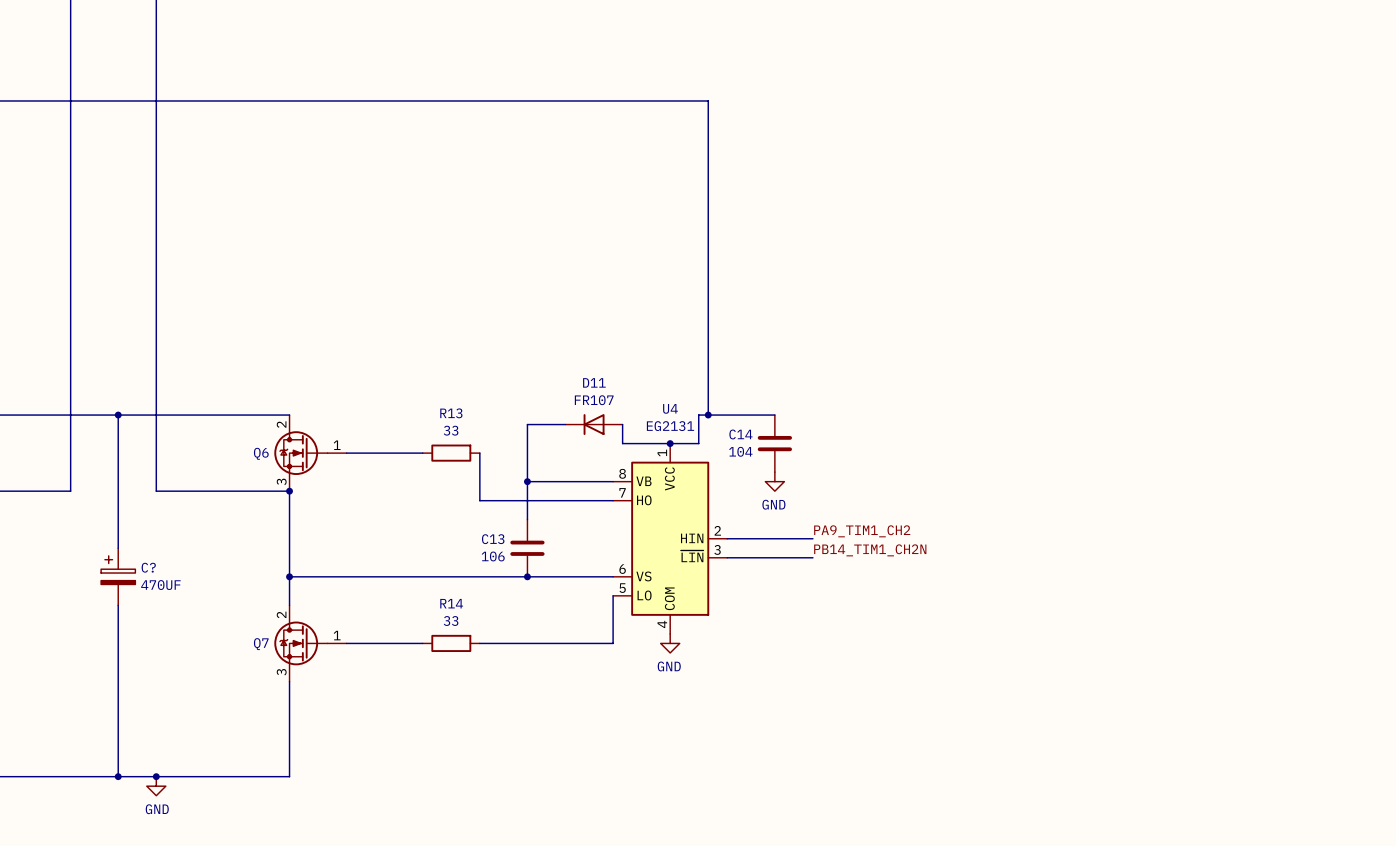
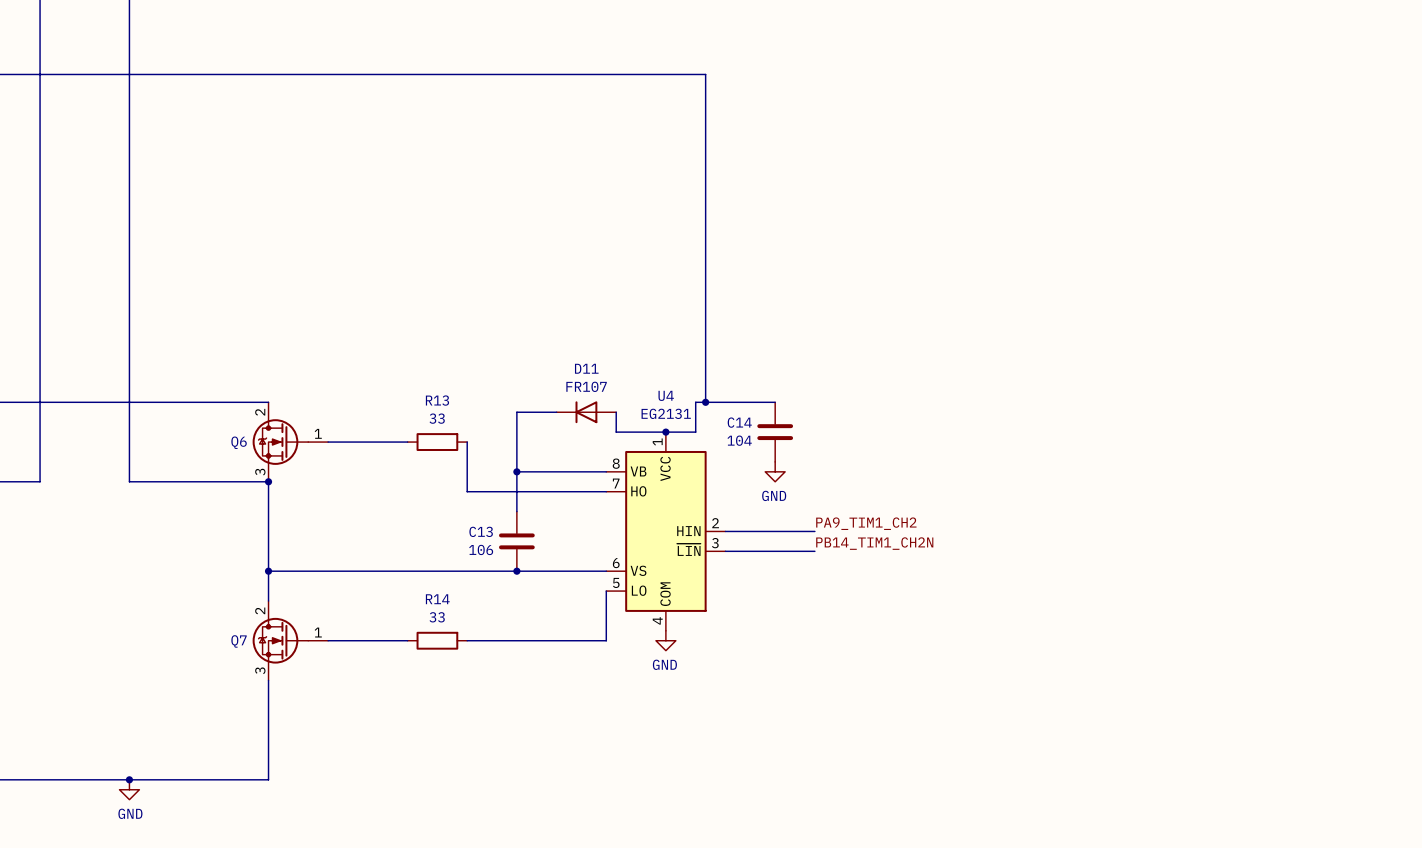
wire: (118, 415) (118, 548) -> none
junction: (118, 415) -> none
C?: 470UF (118, 576) -> none
wire: (118, 605) (118, 776) -> none
junction: (118, 776) -> none

